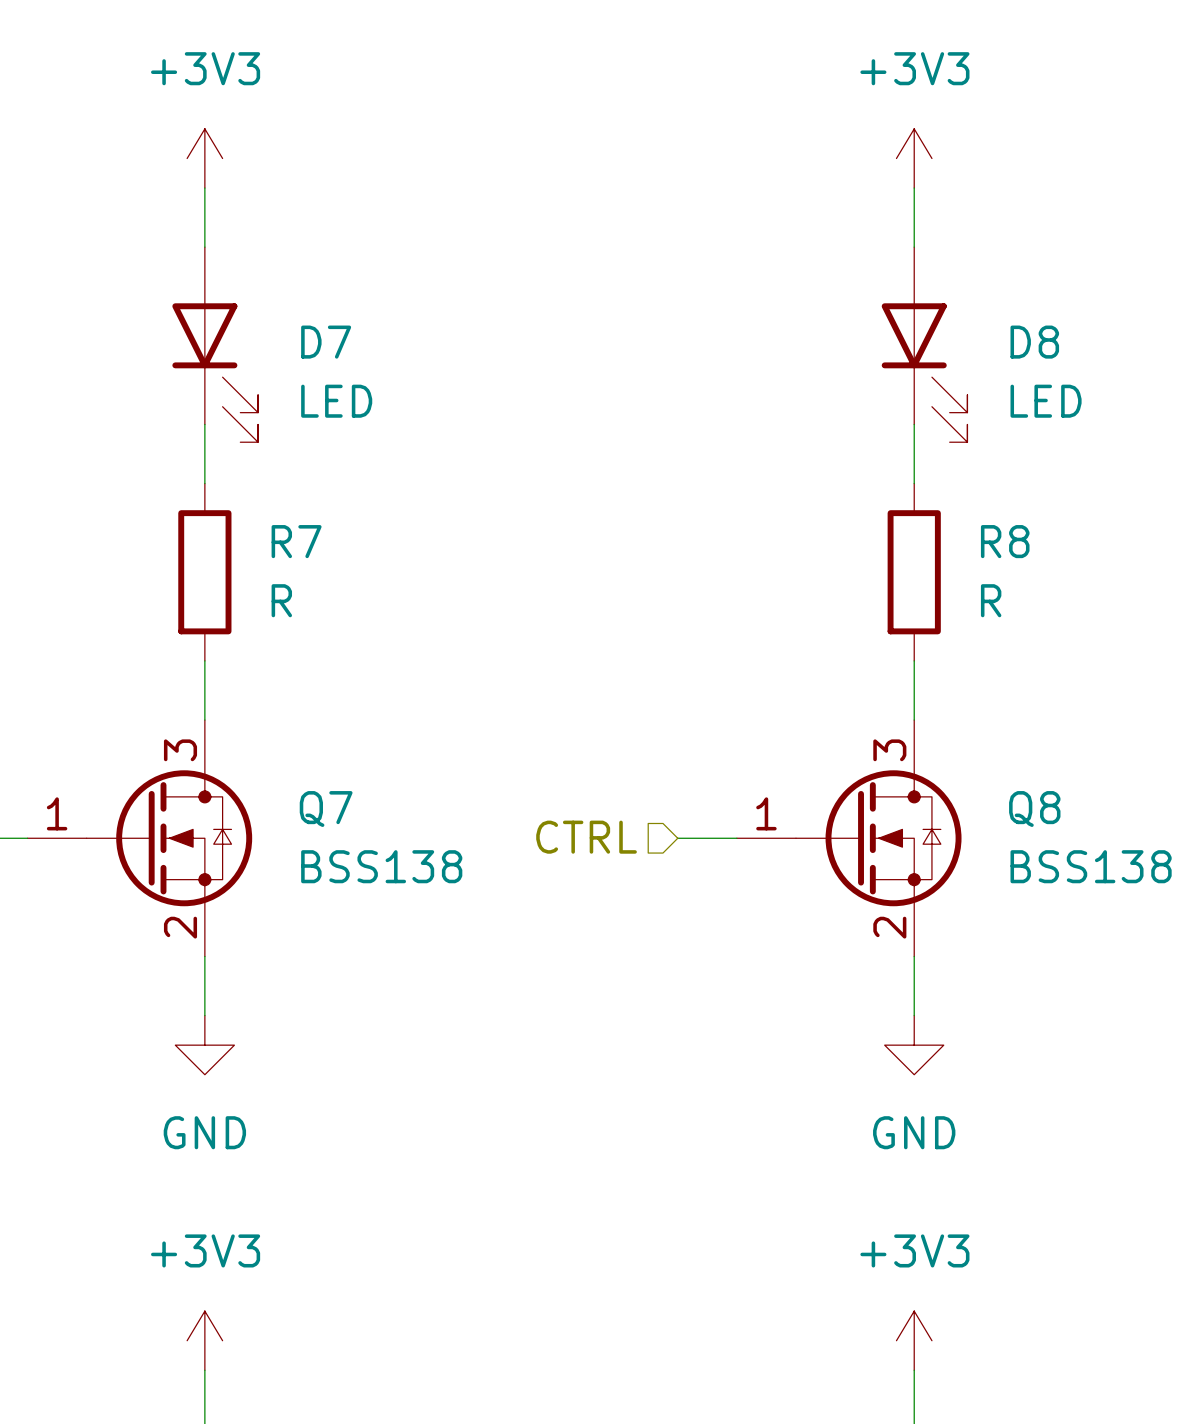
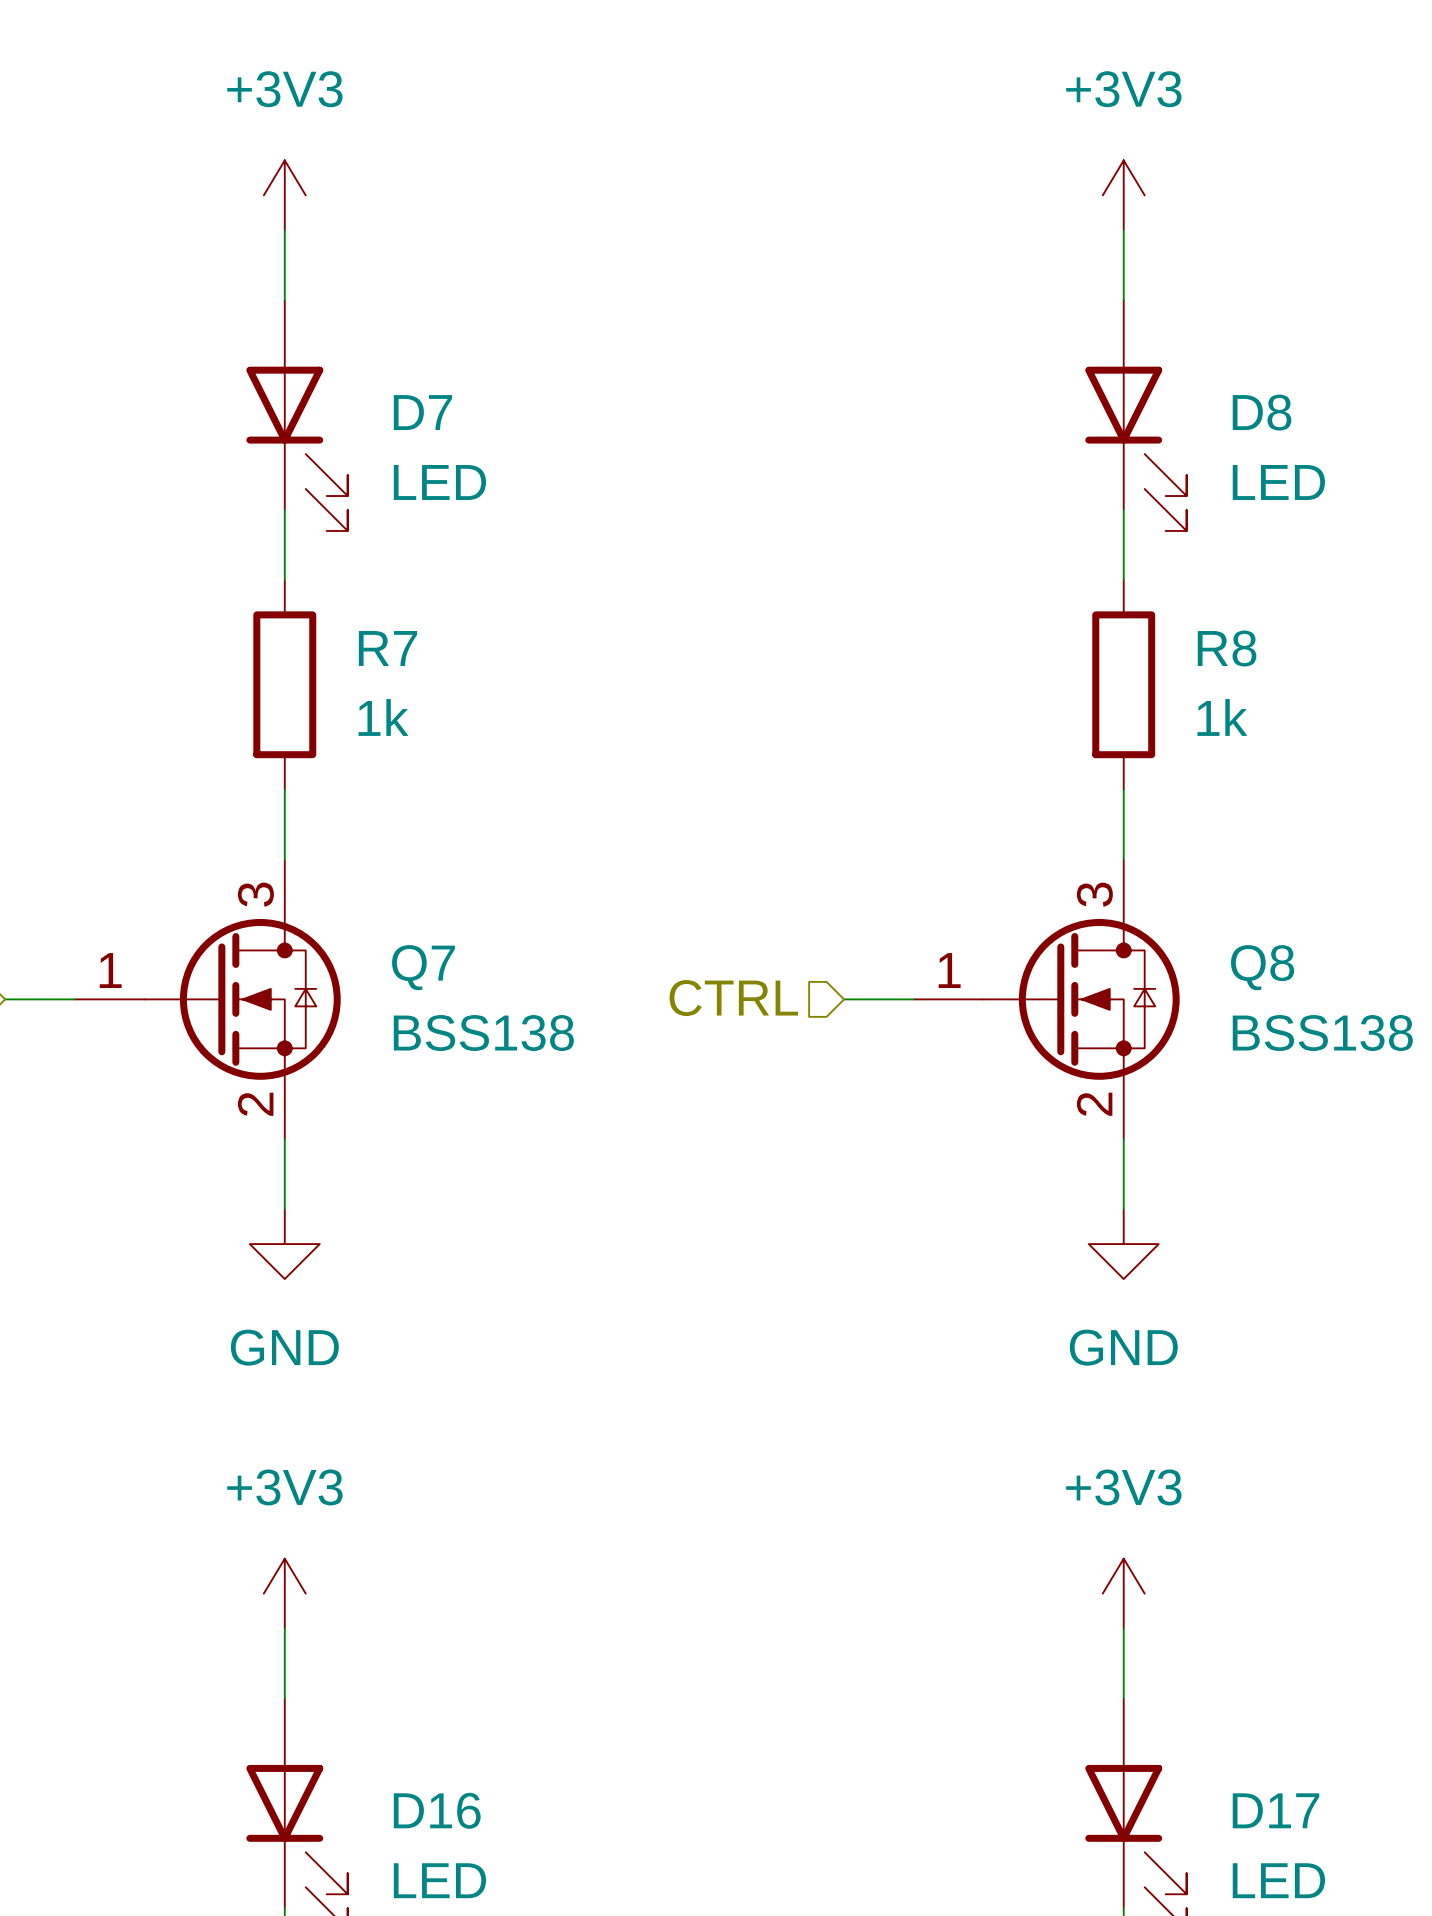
R7 value: R (281, 600) -> 1k (383, 717)
R8 value: R (991, 600) -> 1k (1222, 717)

